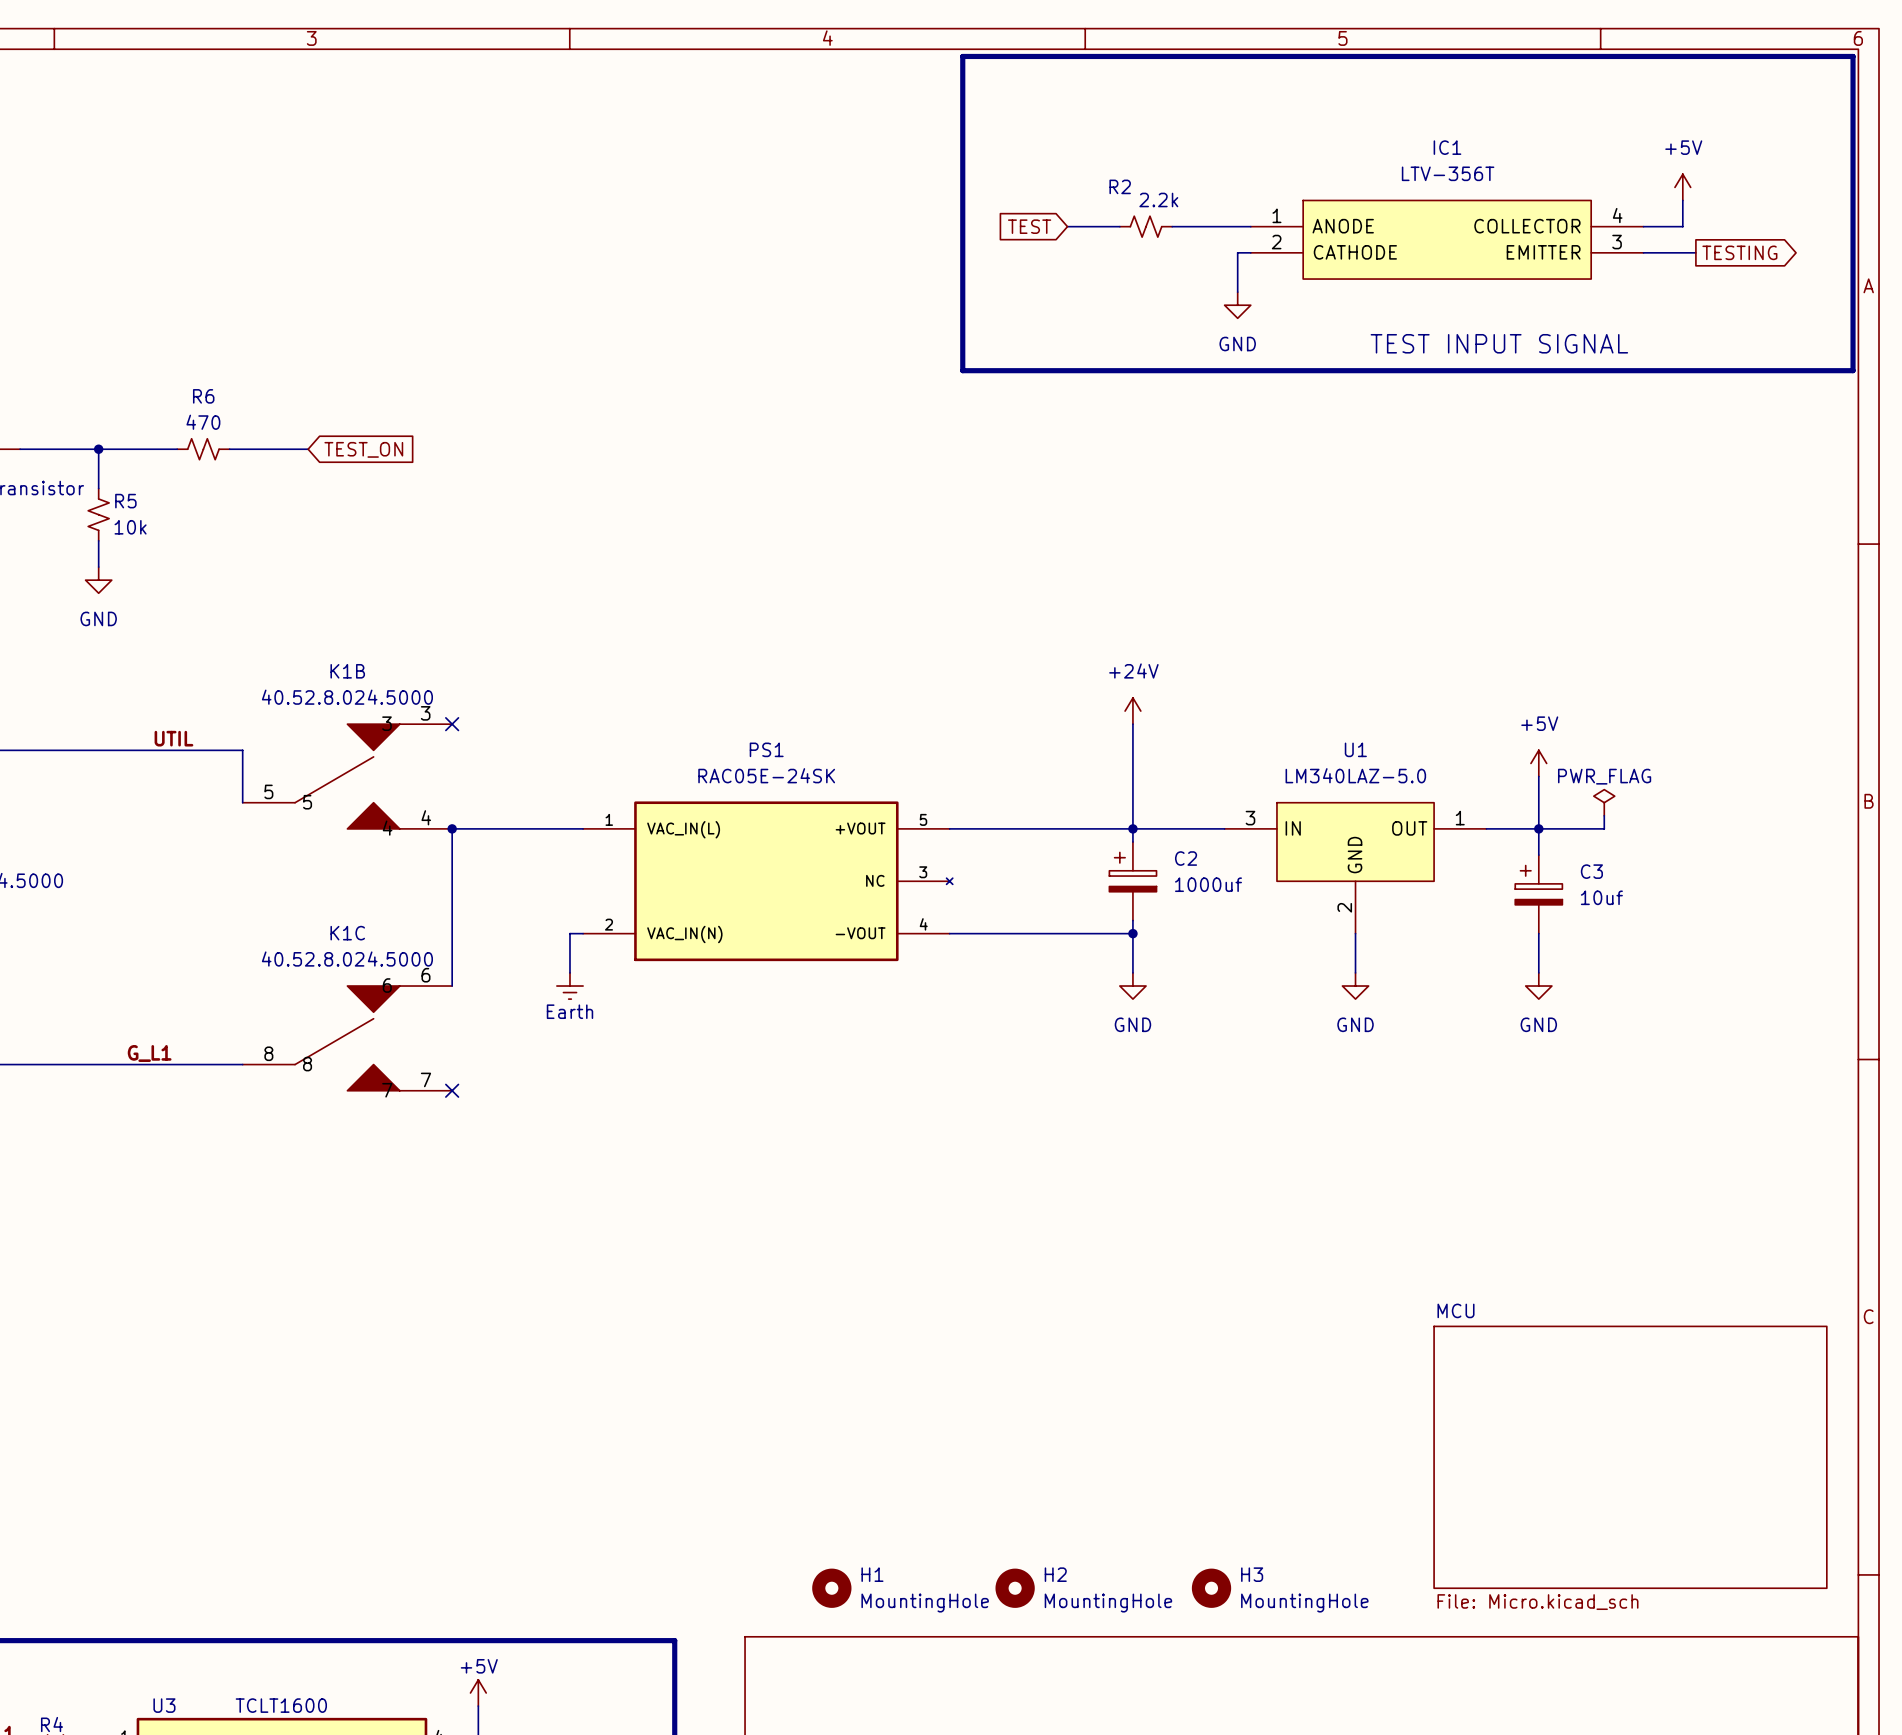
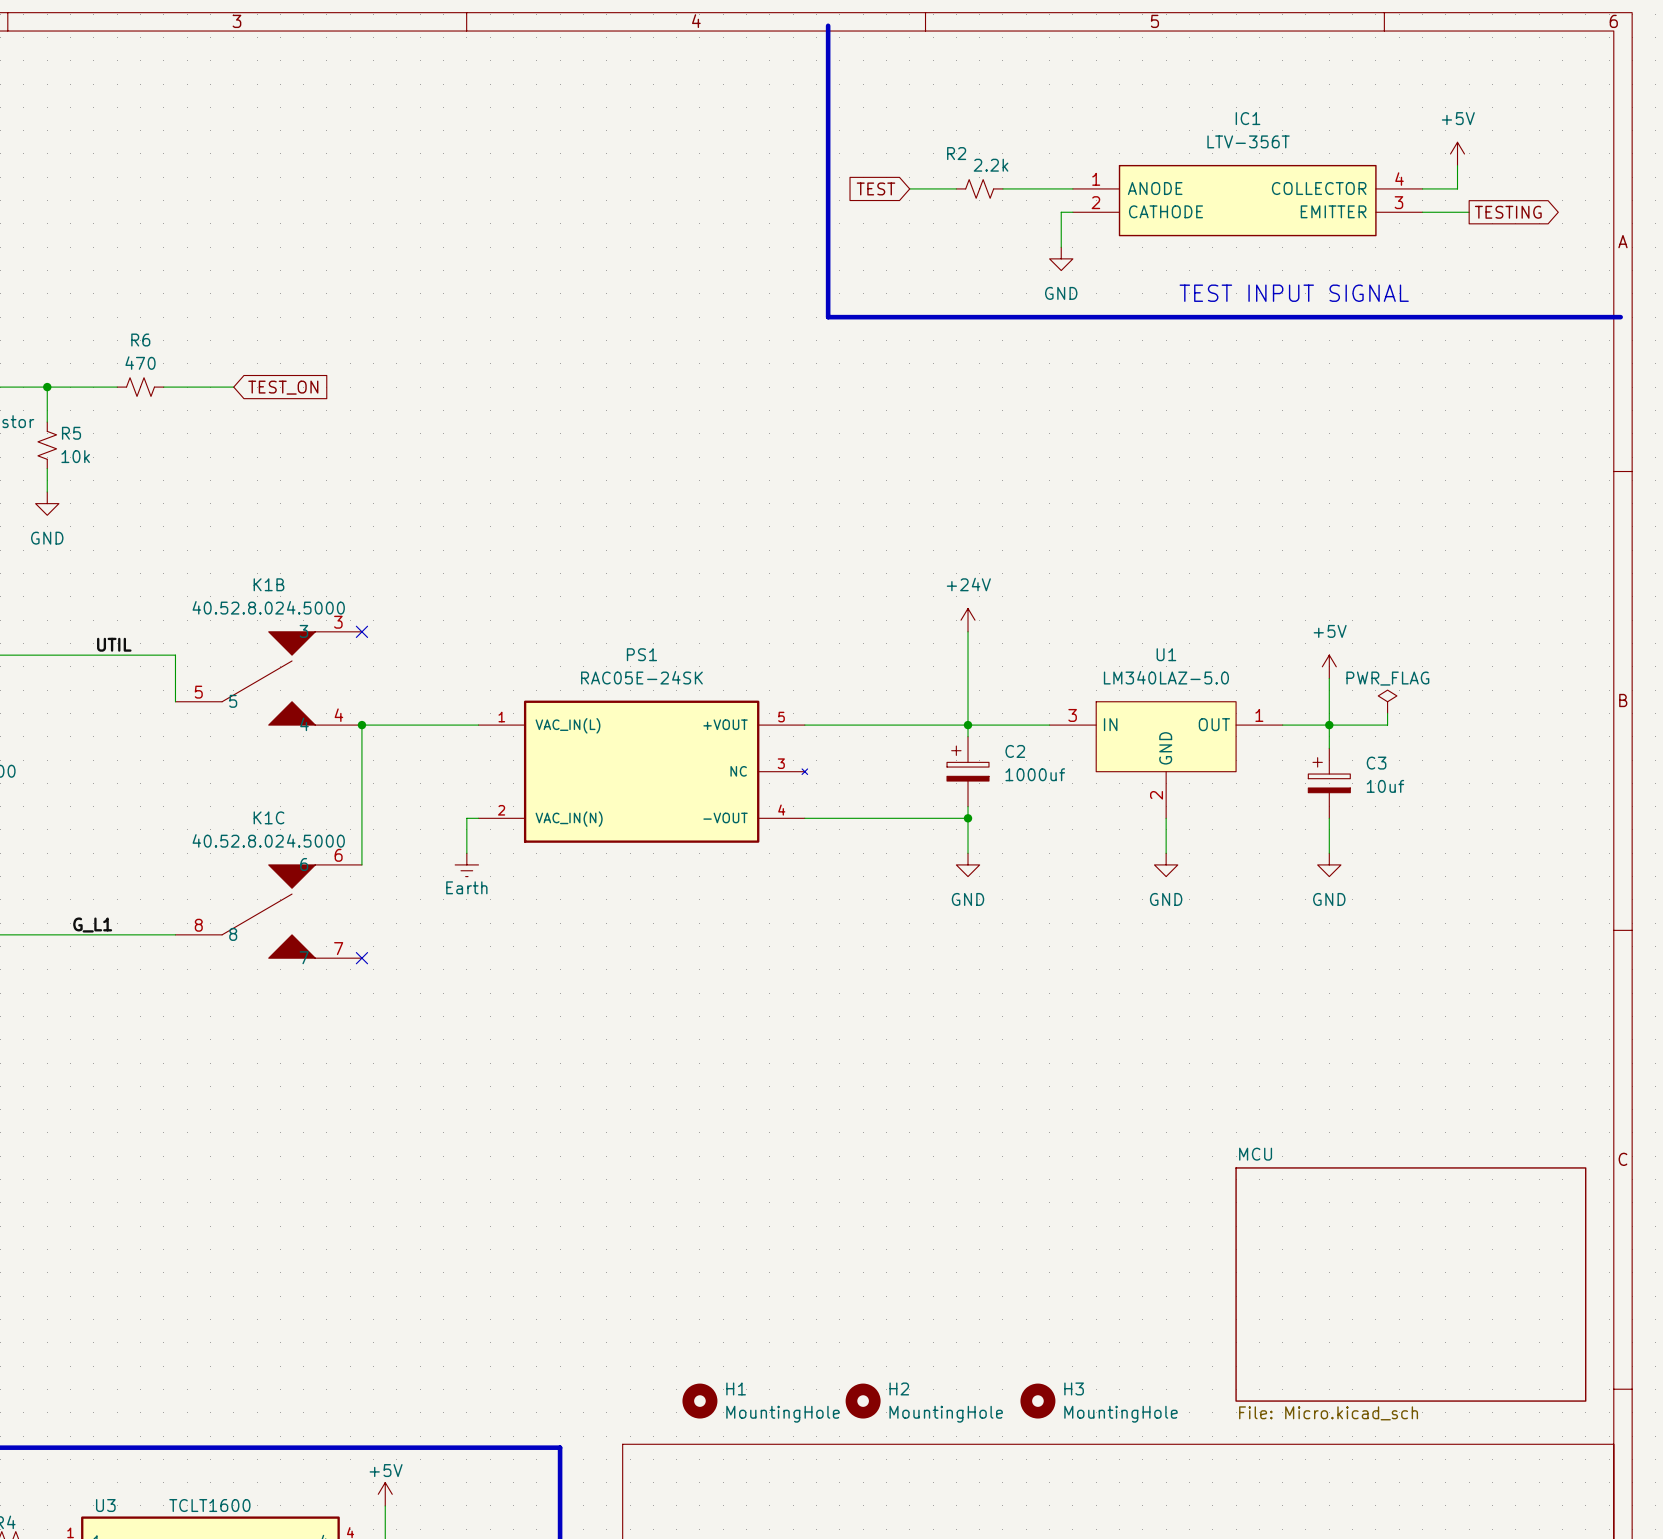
line: none -> (828, 25) (828, 317)
line: (975, 370) (962, 370) (962, 56) (1853, 56) (1853, 370) -> (1620, 317) (1609, 317)

